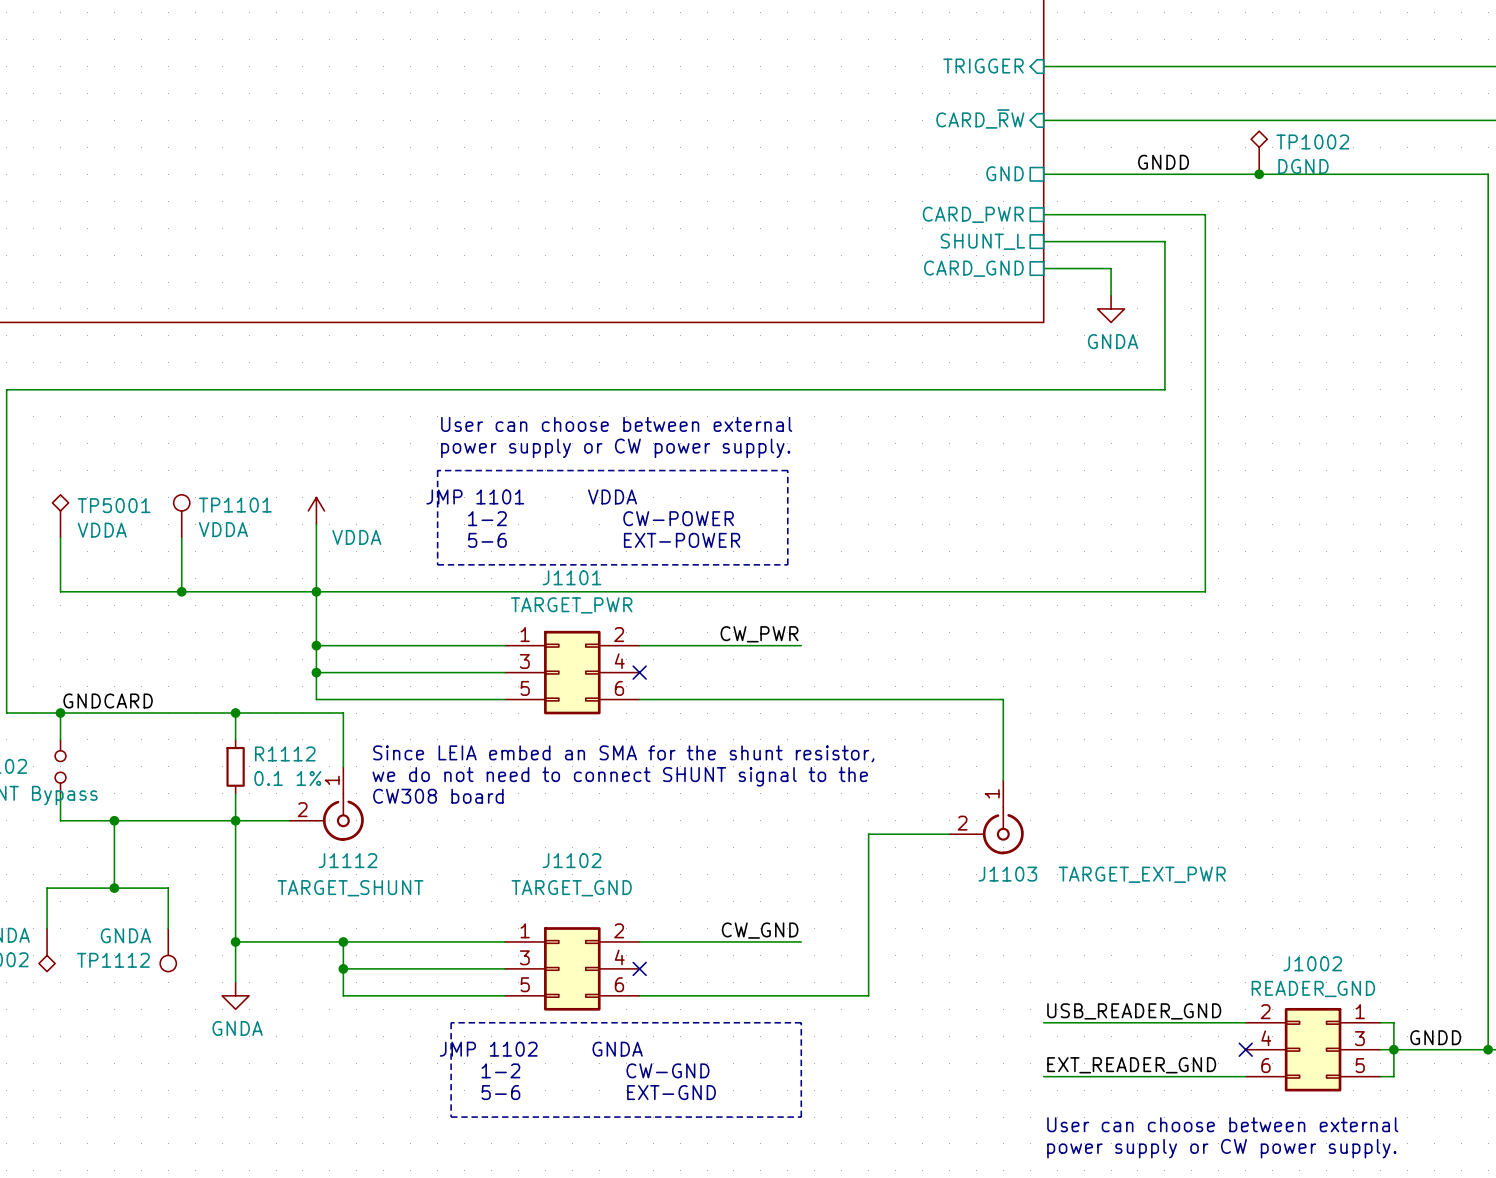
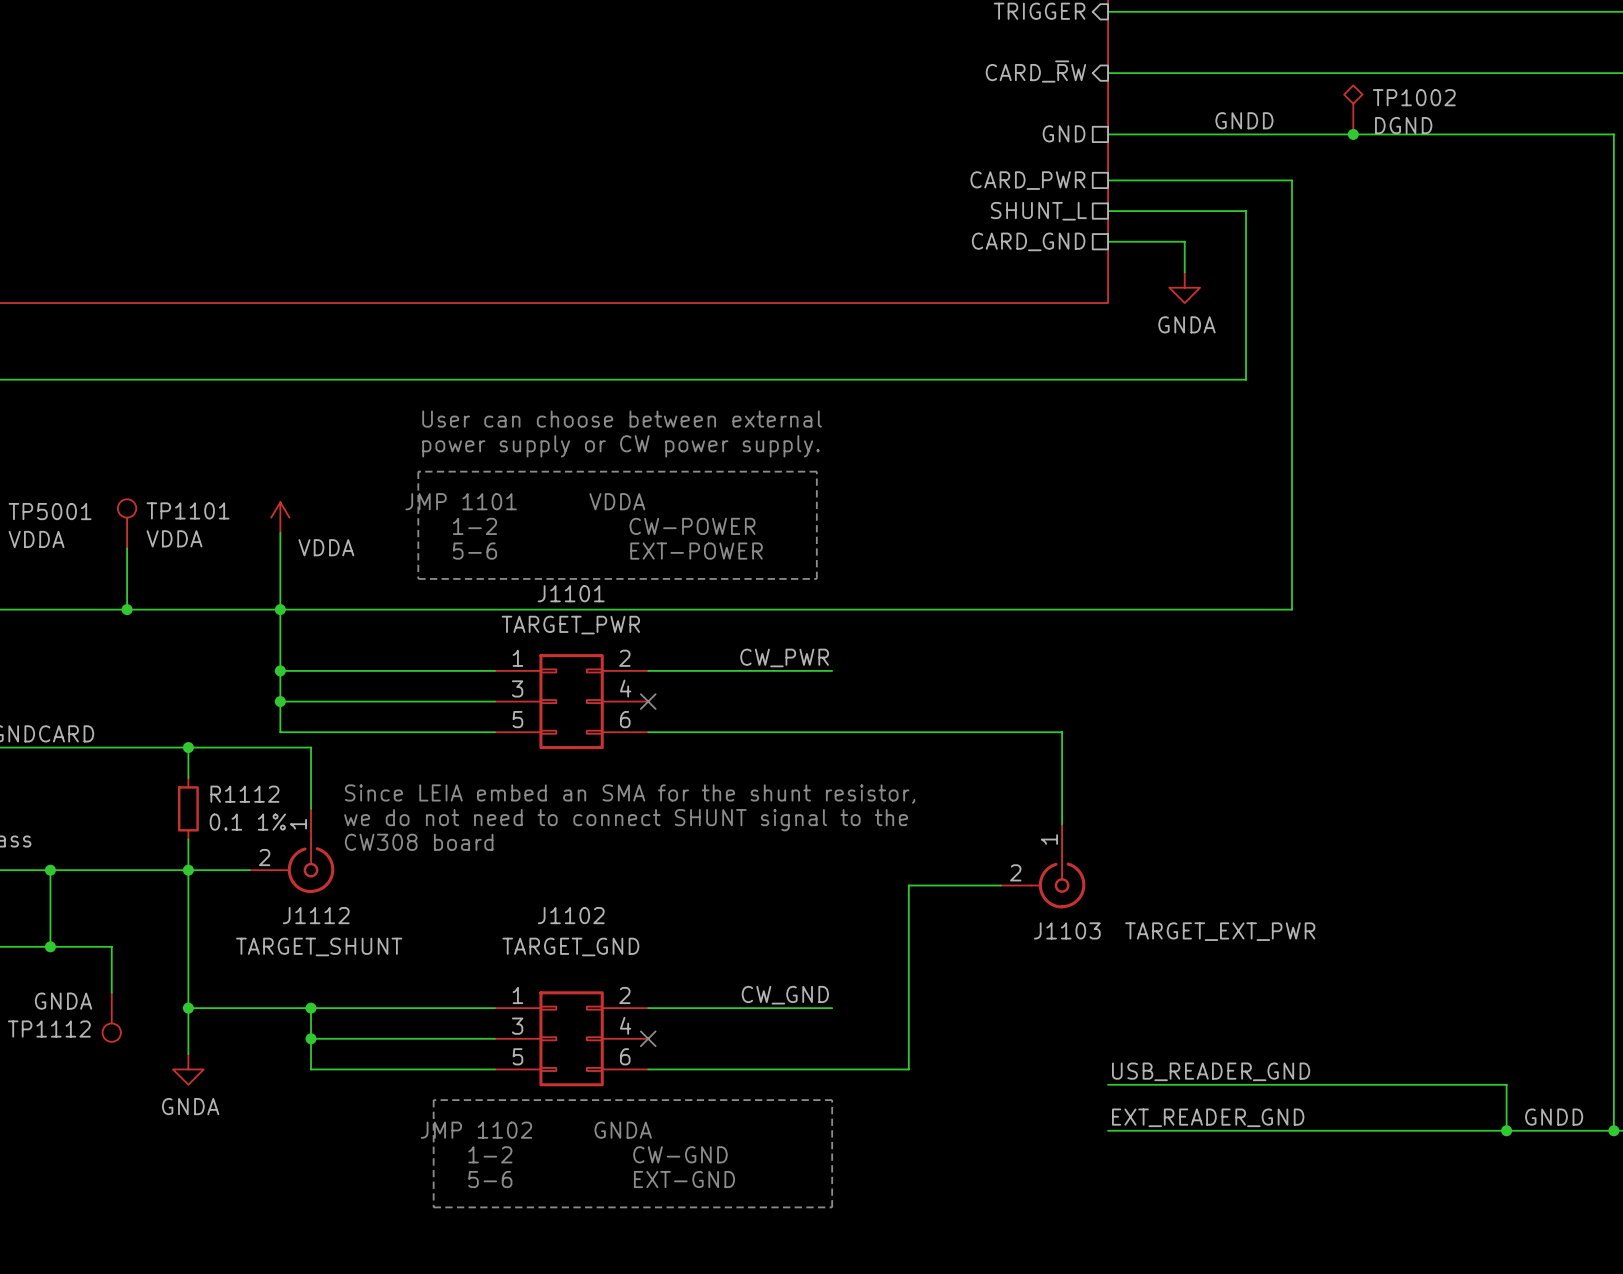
label position: USB_READER_GND (1134, 1011) -> USB_READER_GND (1211, 1071)
wire: (1043, 1022) (1245, 1022) -> none
wire: (1380, 1022) (1393, 1022) -> (1108, 1084) (1506, 1084) (1506, 1100)
wire: none -> (1108, 1130) (1491, 1130)
no-connect mark: (1245, 1049) -> none
J1002: READER_GND (1313, 1049) -> none
wire: (1393, 1049) (1393, 1076) (1380, 1076) -> none
label position: EXT_READER_GND (1131, 1065) -> EXT_READER_GND (1208, 1117)
wire: (1043, 1076) (1245, 1076) -> none
text: User can choose between external (1222, 1124) -> none
text: power supply or CW power supply. (1221, 1148) -> none

